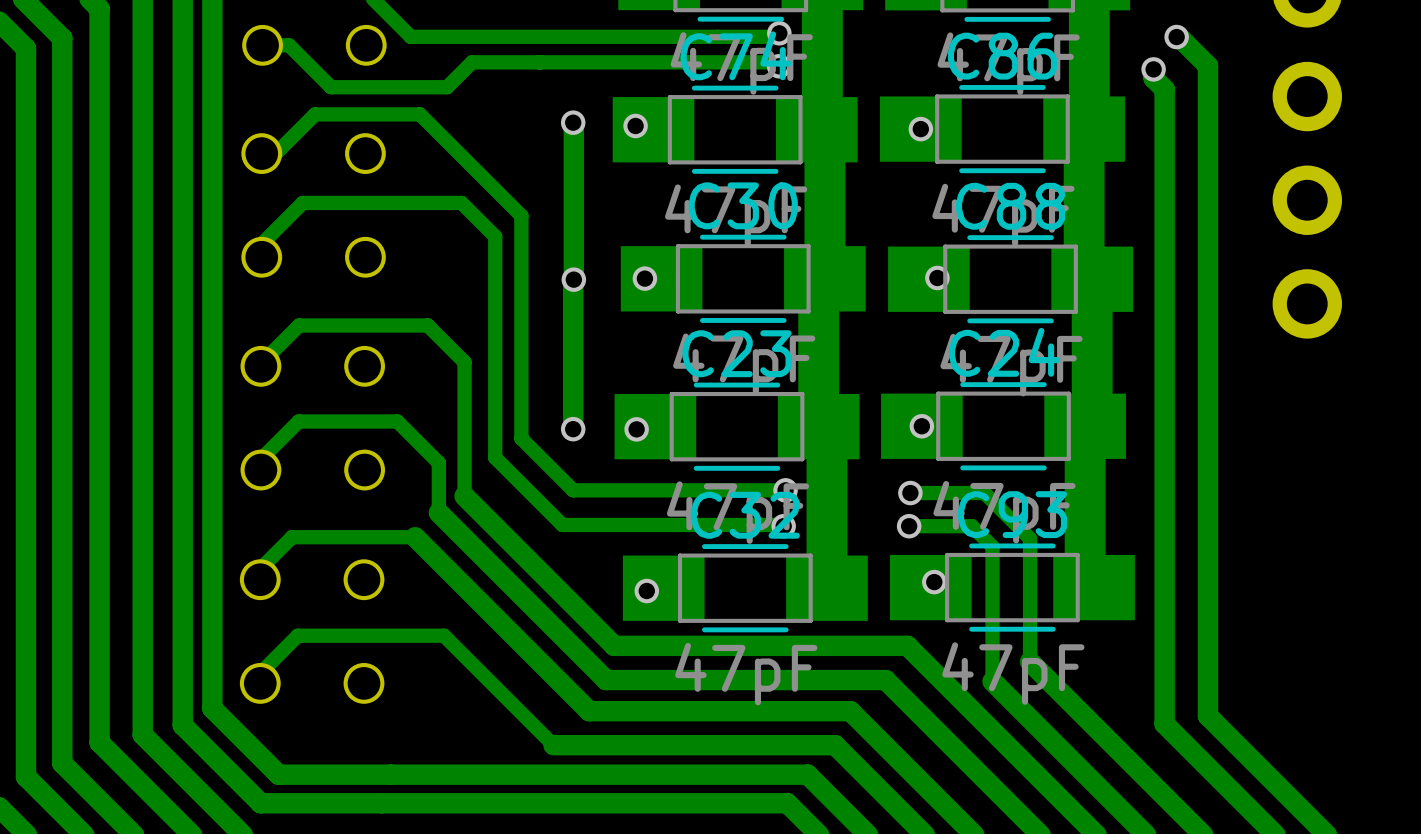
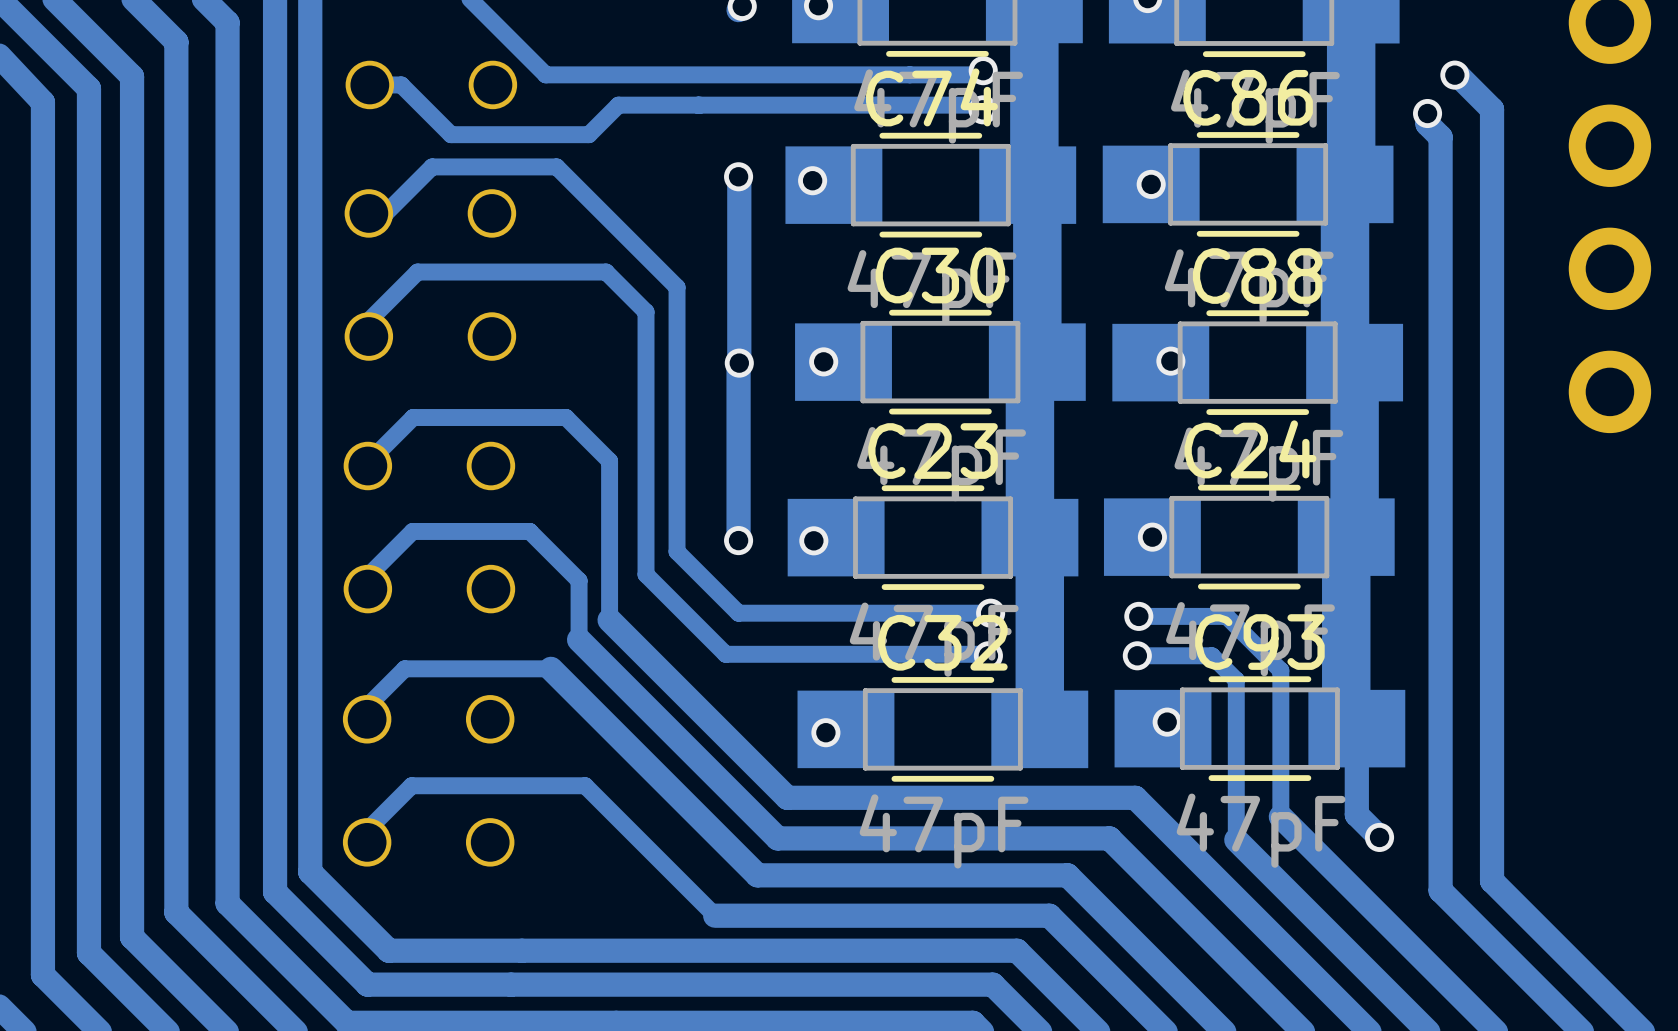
track: none -> (1356, 728) (1356, 814) (1379, 837)
via: none -> (1379, 837)

